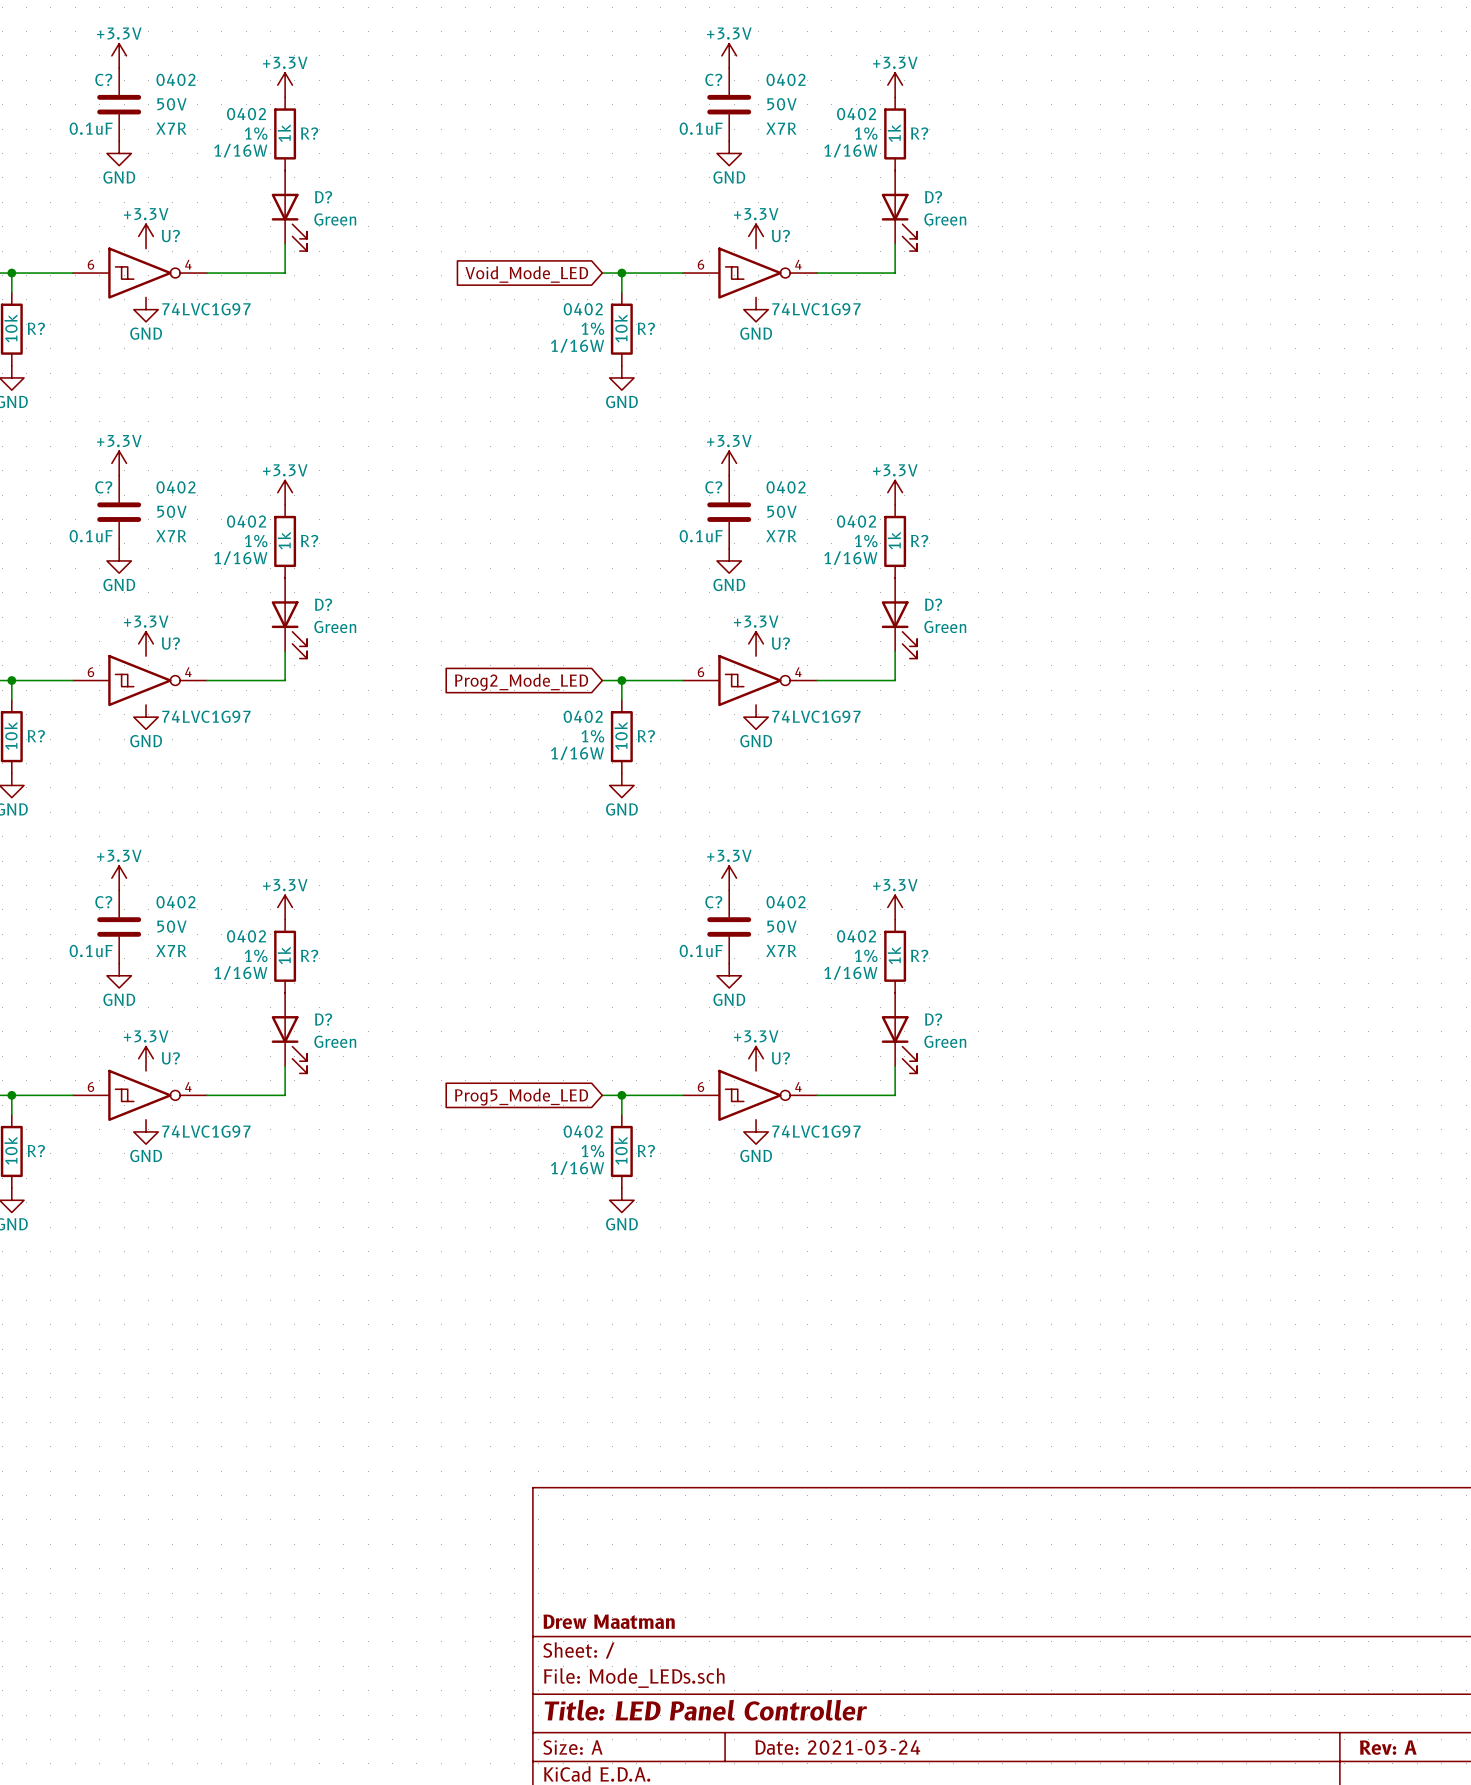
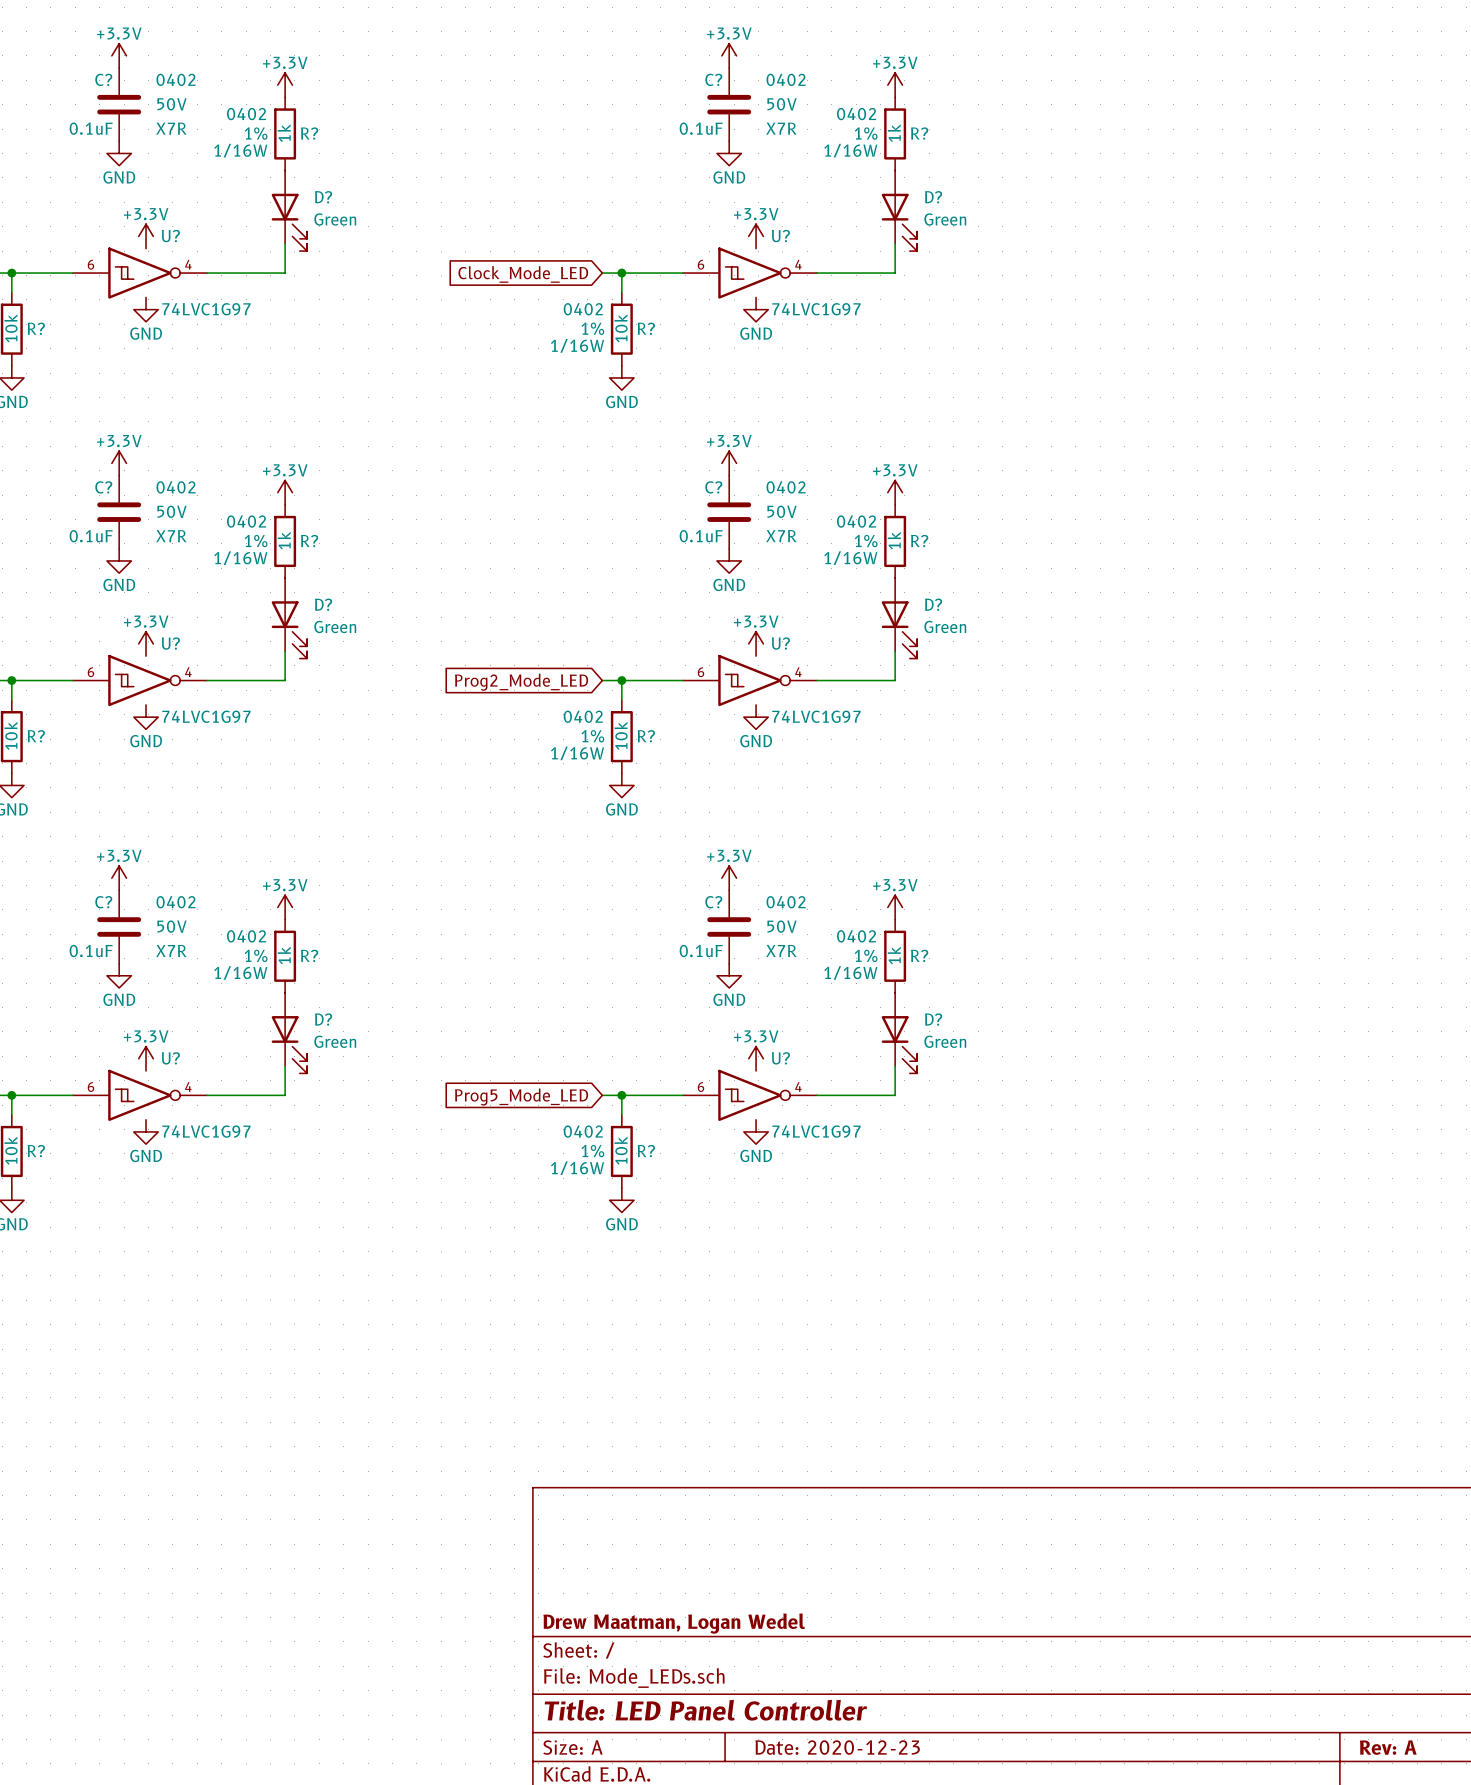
global label: Void_Mode_LED (526, 274) -> Clock_Mode_LED (523, 274)
title block: Drew Maatman (609, 1621) -> Drew Maatman, Logan Wedel (674, 1623)
title block: Date: 2021-03-24 (837, 1747) -> Date: 2020-12-23 (837, 1747)

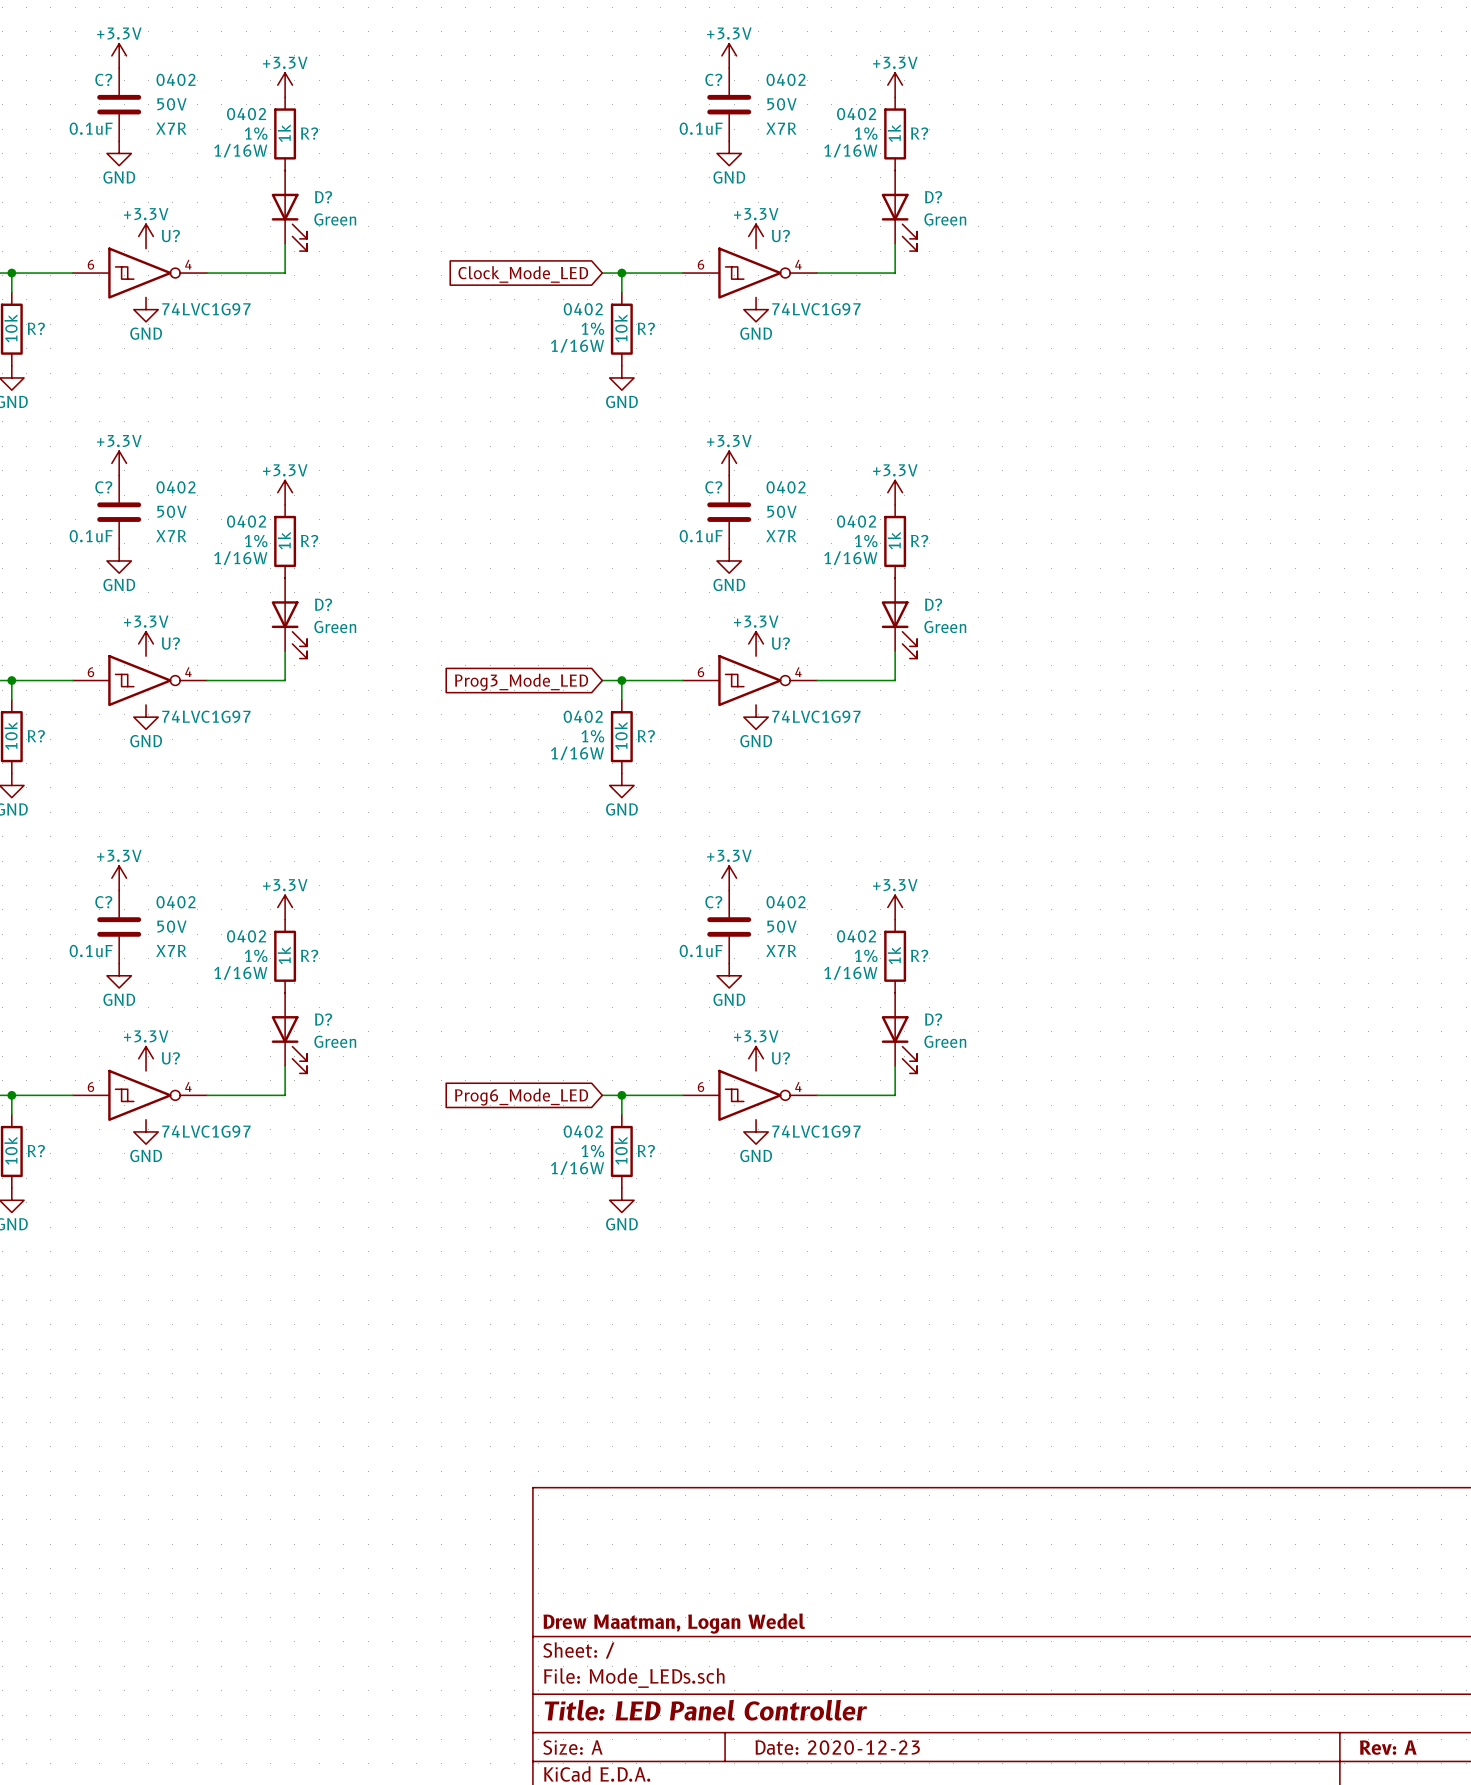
global label: Prog2_Mode_LED (521, 682) -> Prog3_Mode_LED (521, 682)
global label: Prog5_Mode_LED (521, 1097) -> Prog6_Mode_LED (521, 1097)

